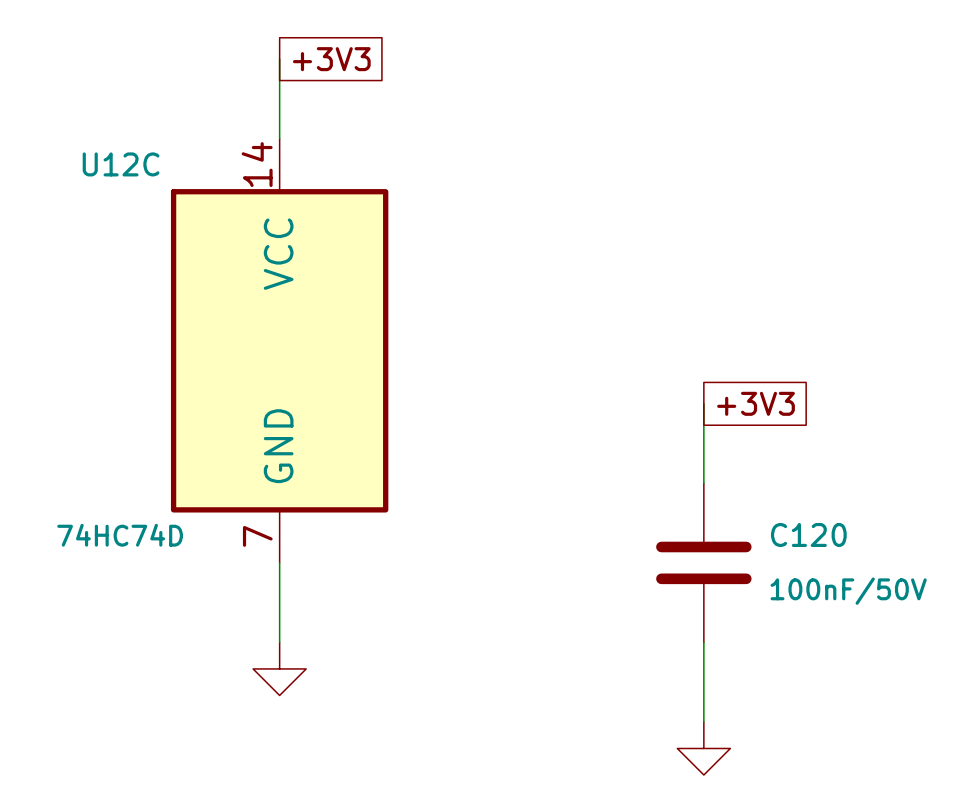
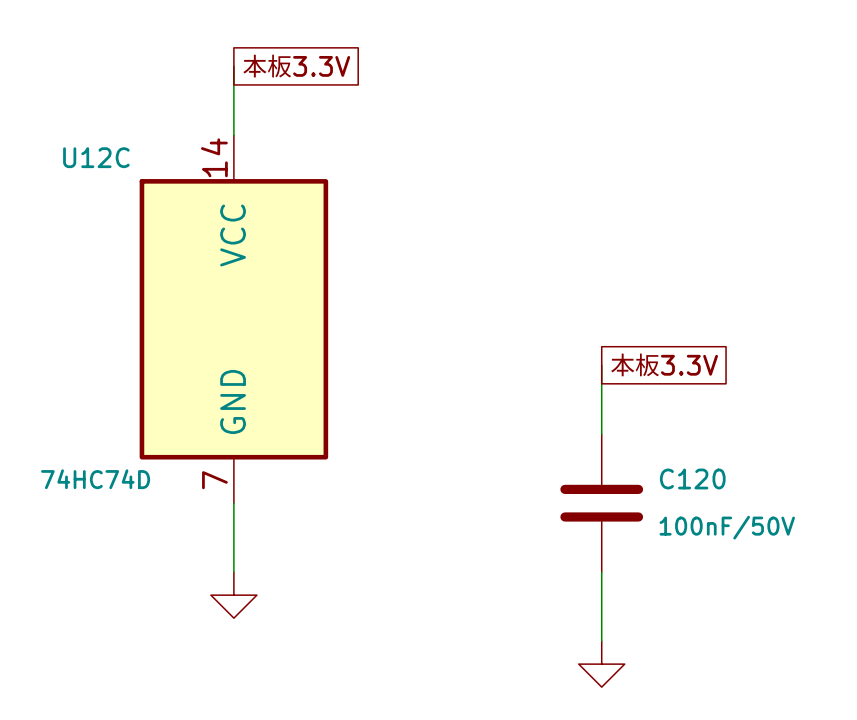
global label: +3V3 (331, 59) -> 本板3.3V (296, 66)
global label: +3V3 (756, 403) -> 本板3.3V (663, 364)

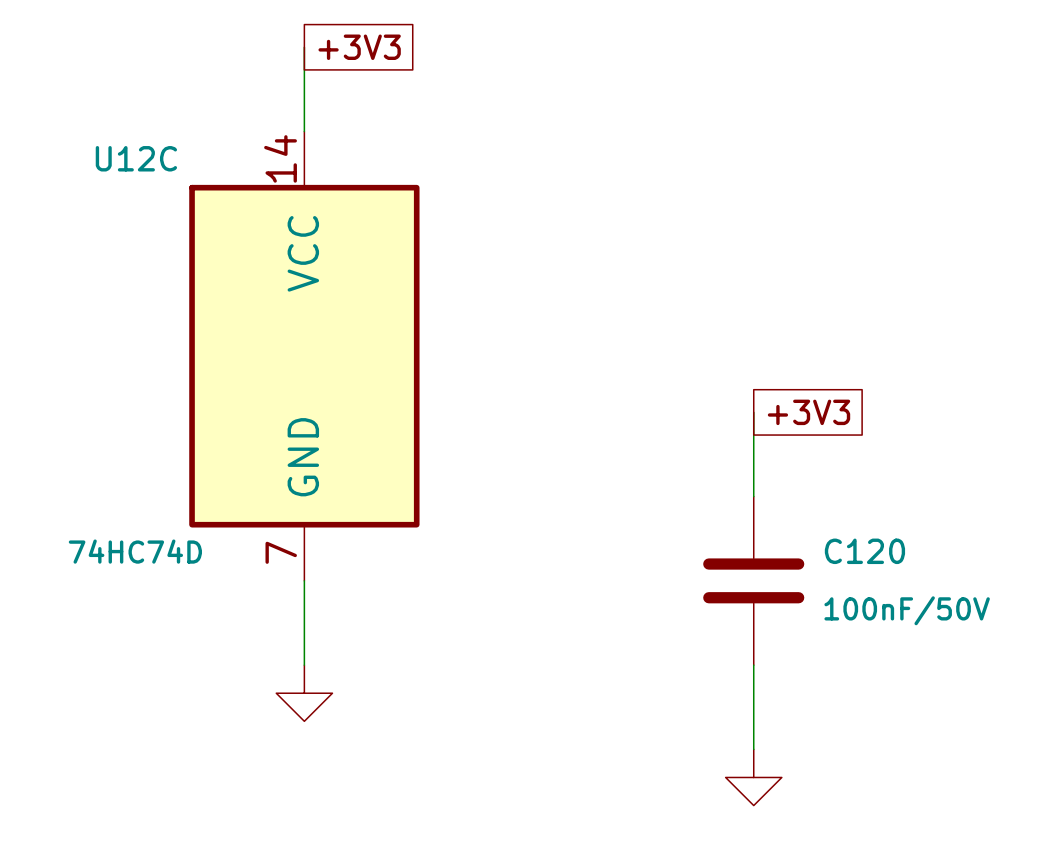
global label: 本板3.3V (296, 66) -> +3V3 (359, 47)
global label: 本板3.3V (663, 364) -> +3V3 (809, 412)

